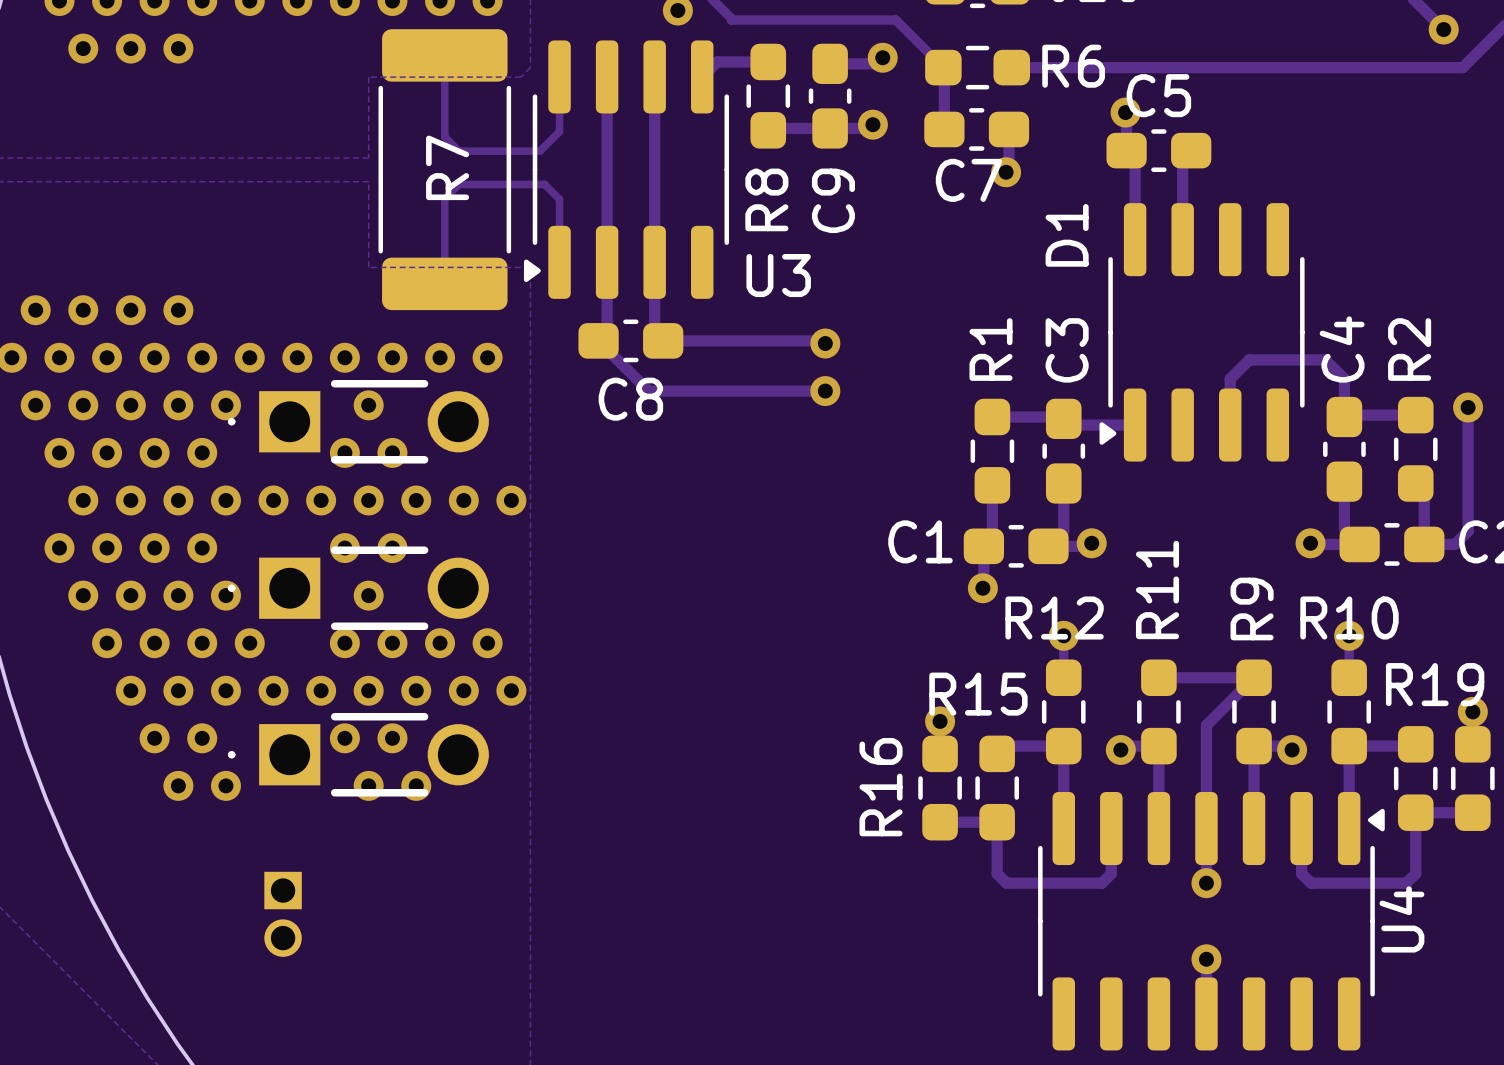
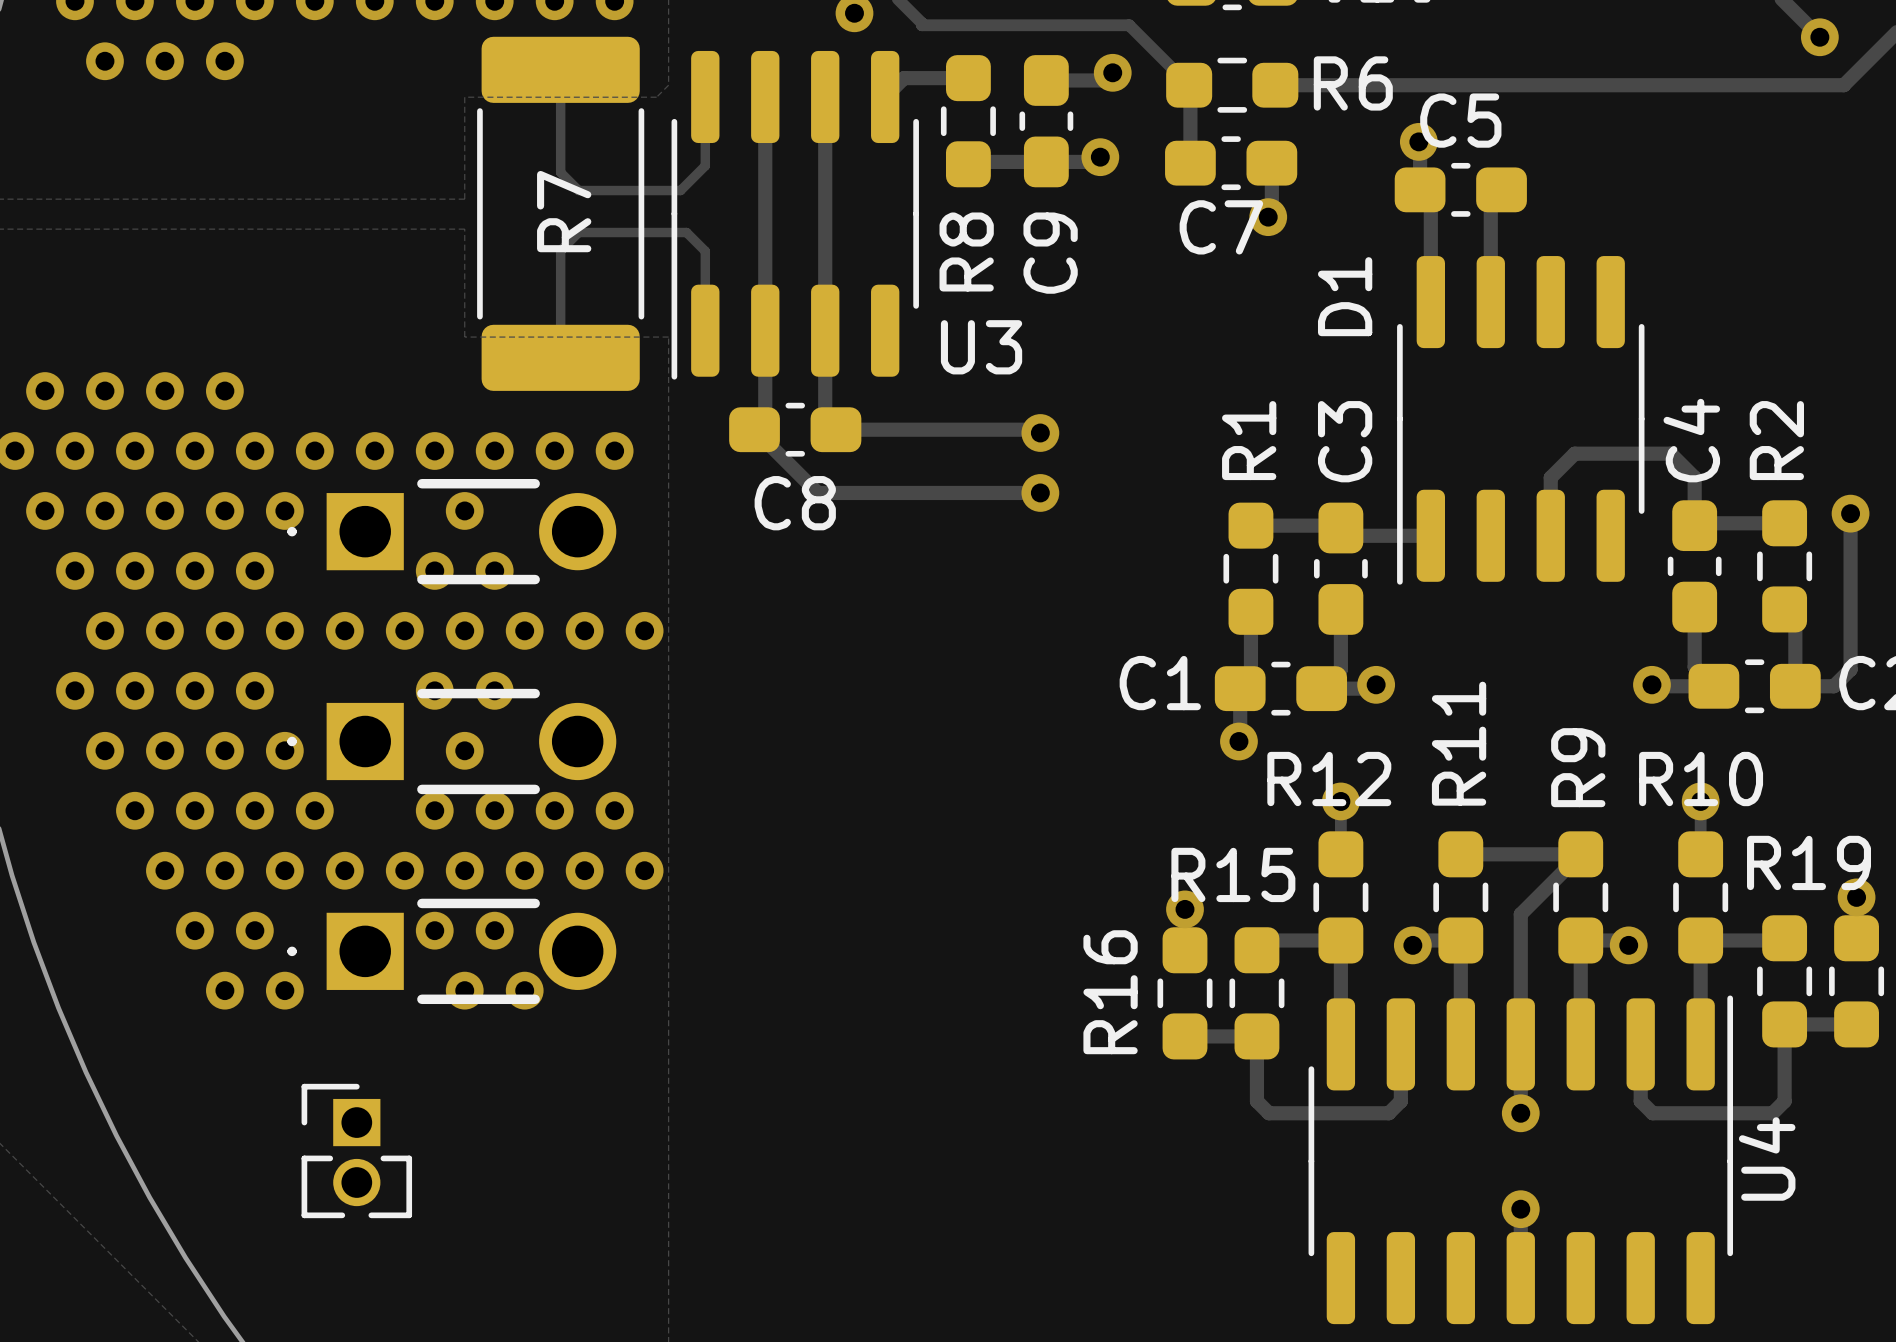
U3 footprint: [523, 40, 730, 299] -> [671, 50, 919, 380]
D1 footprint: [1099, 203, 1305, 462] -> [1397, 256, 1645, 585]
U4 footprint: [1038, 792, 1385, 1051] -> [1308, 995, 1734, 1325]
part side: bottom (283, 914) -> top (356, 1151)

